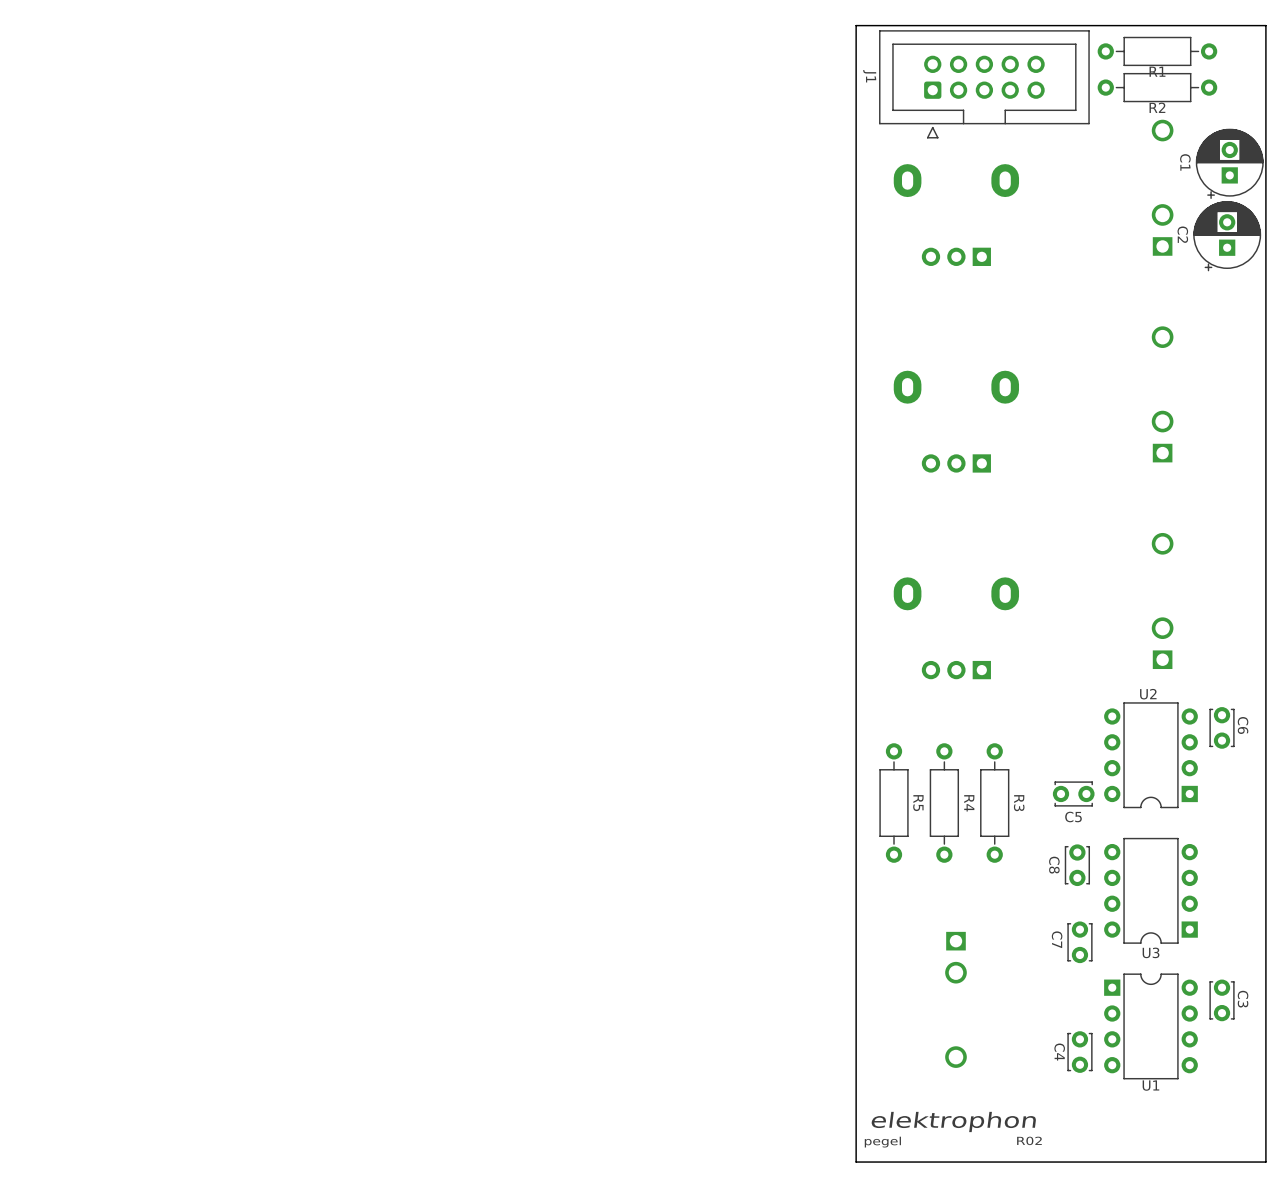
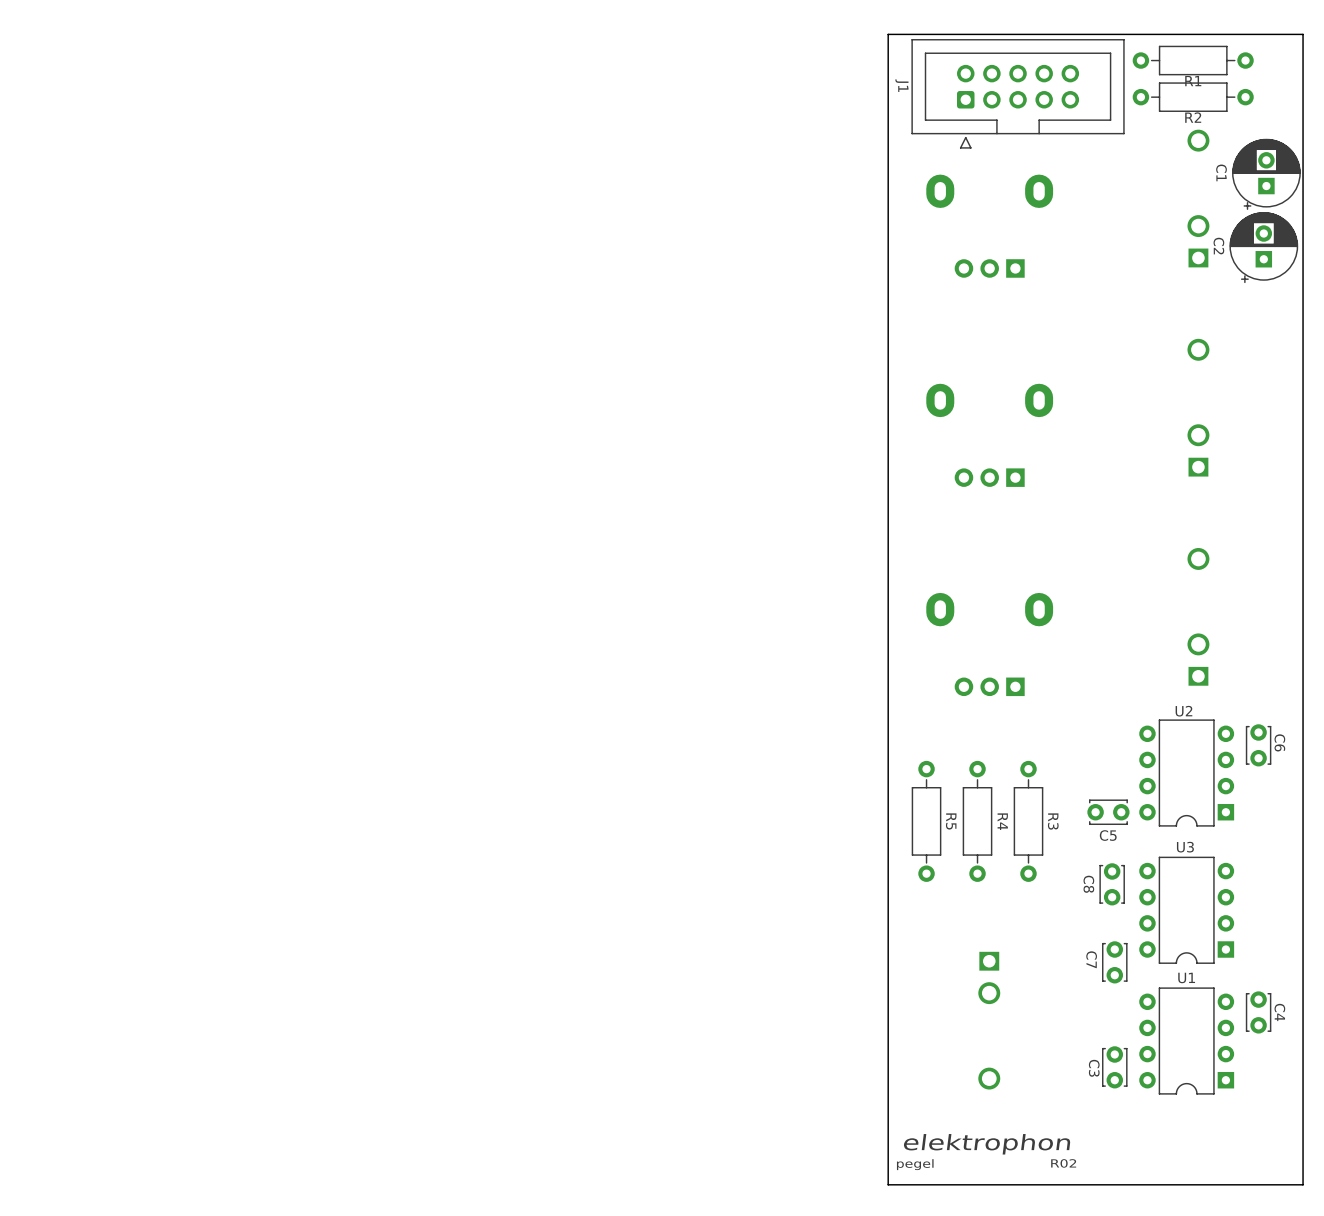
U3 name position: U3 (1151, 952) -> U3 (1185, 847)
C3 name position: C3 (1243, 999) -> C3 (1094, 1068)
C3 position: (1222, 1000) -> (1114, 1067)
U1 rotation: 0° (1150, 1026) -> 180° (1186, 1041)
C4 name position: C4 (1059, 1052) -> C4 (1279, 1012)
C4 position: (1079, 1052) -> (1258, 1012)

